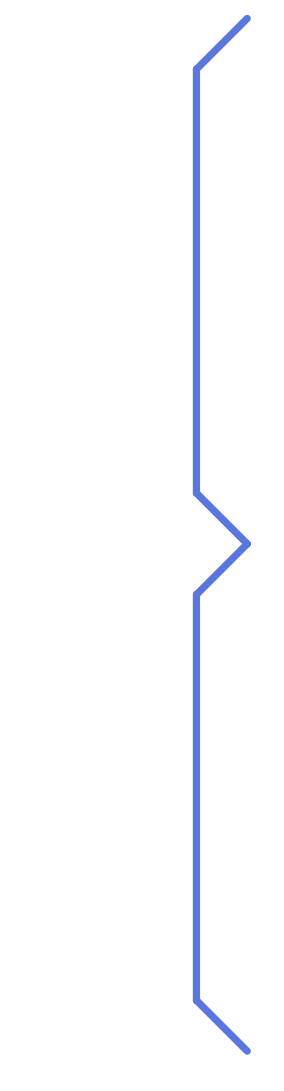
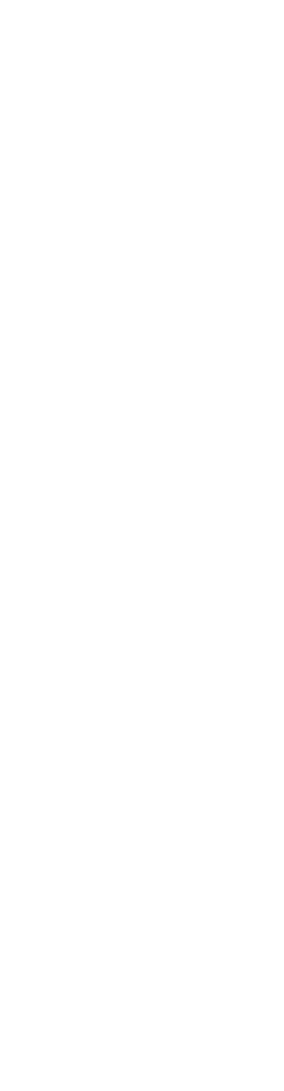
track: (247, 18) (196, 69) (196, 493) (247, 543) (196, 594) (196, 1000) (247, 1051) -> none

